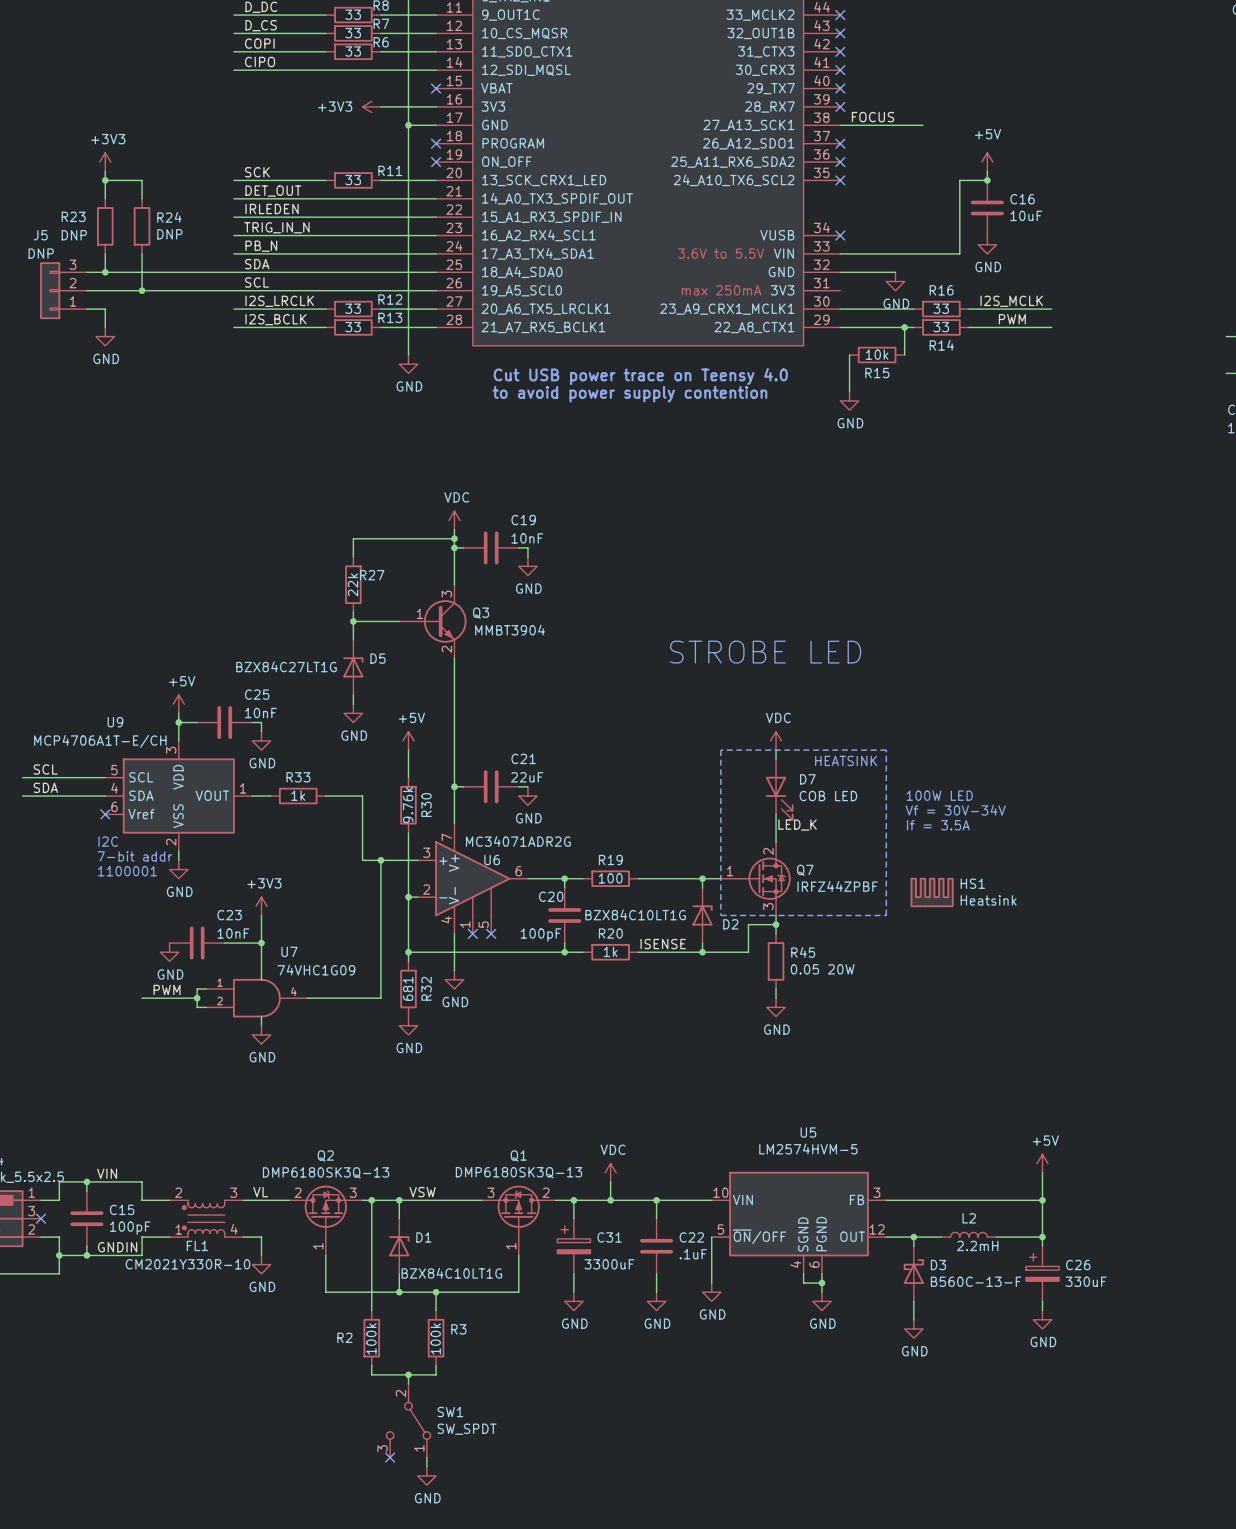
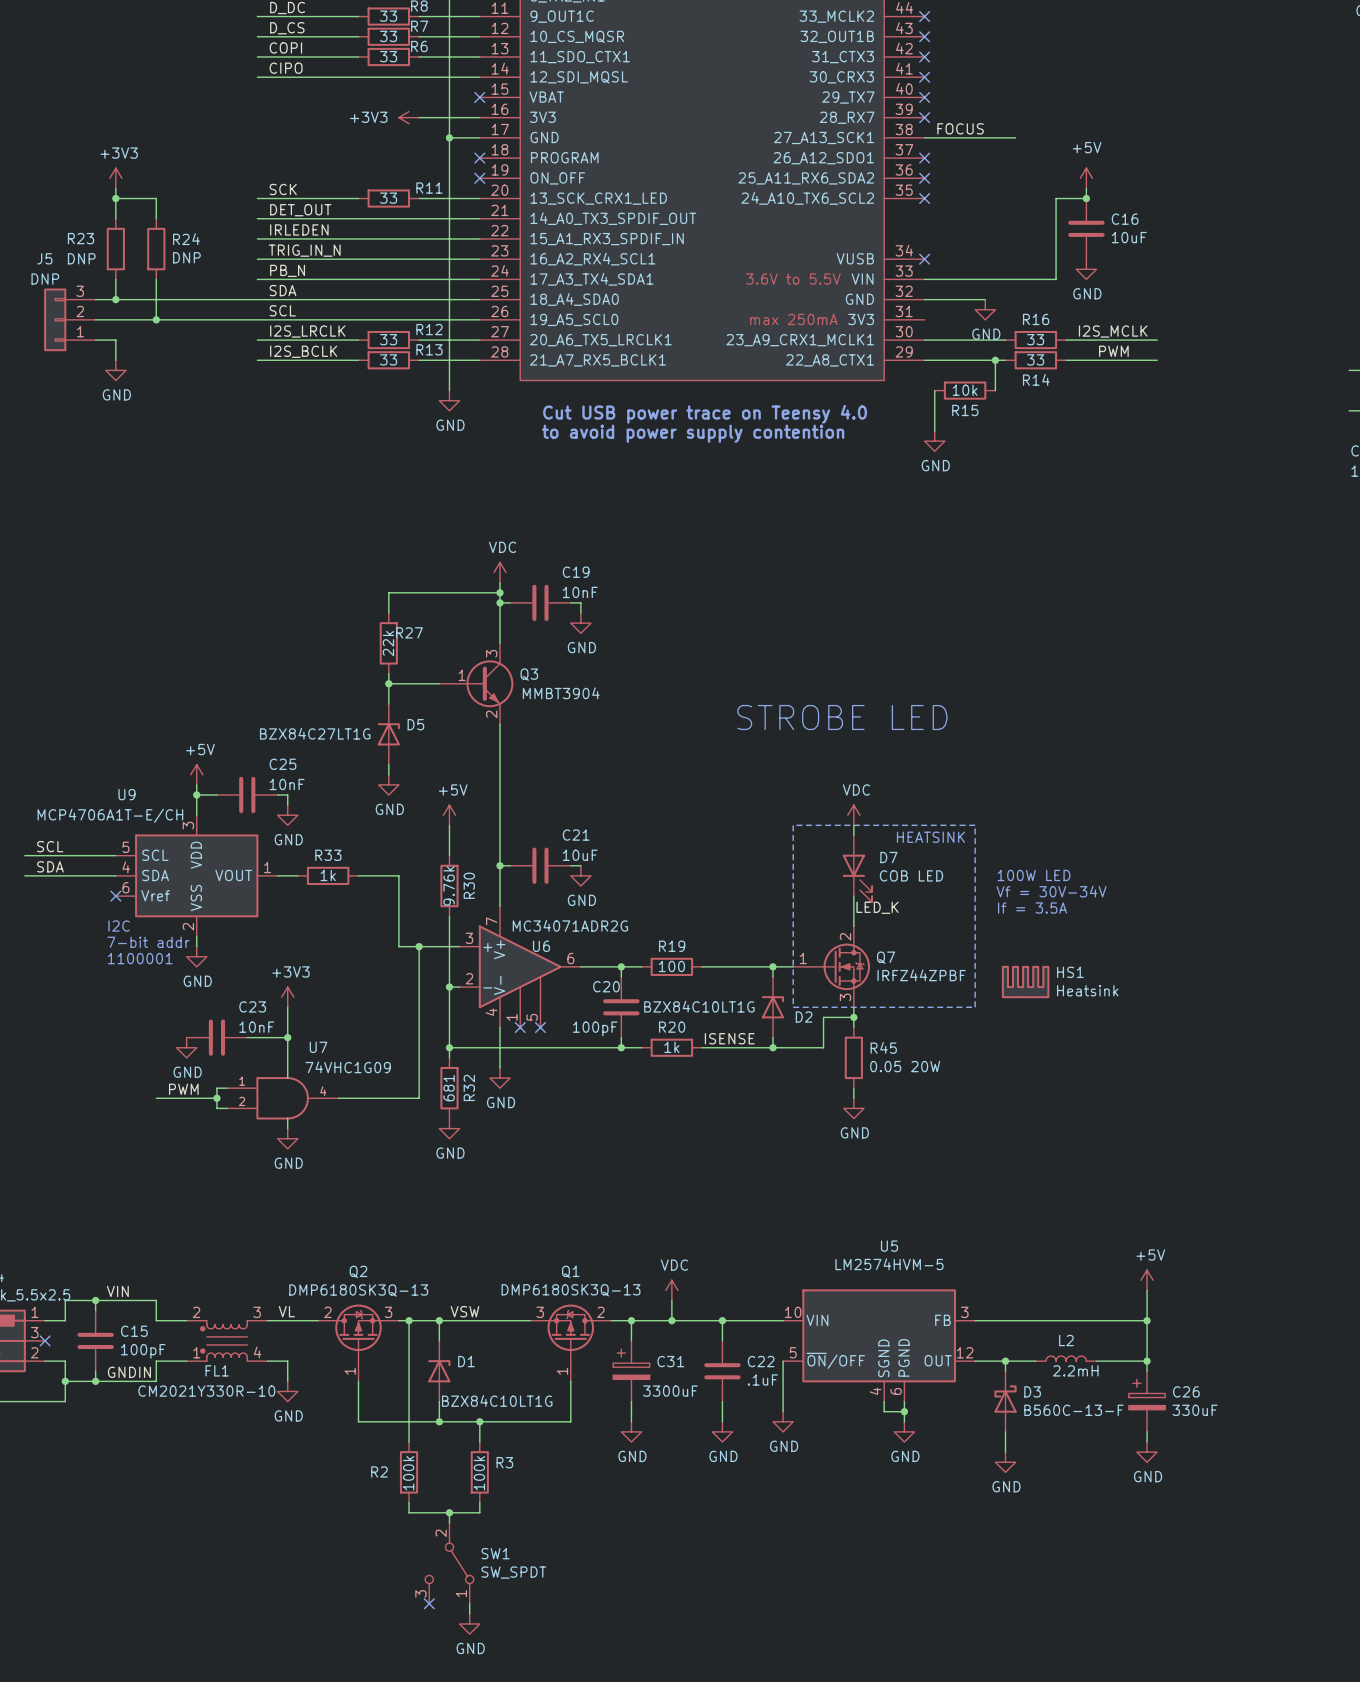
C21 value: 22uF (527, 777) -> 10uF (580, 855)

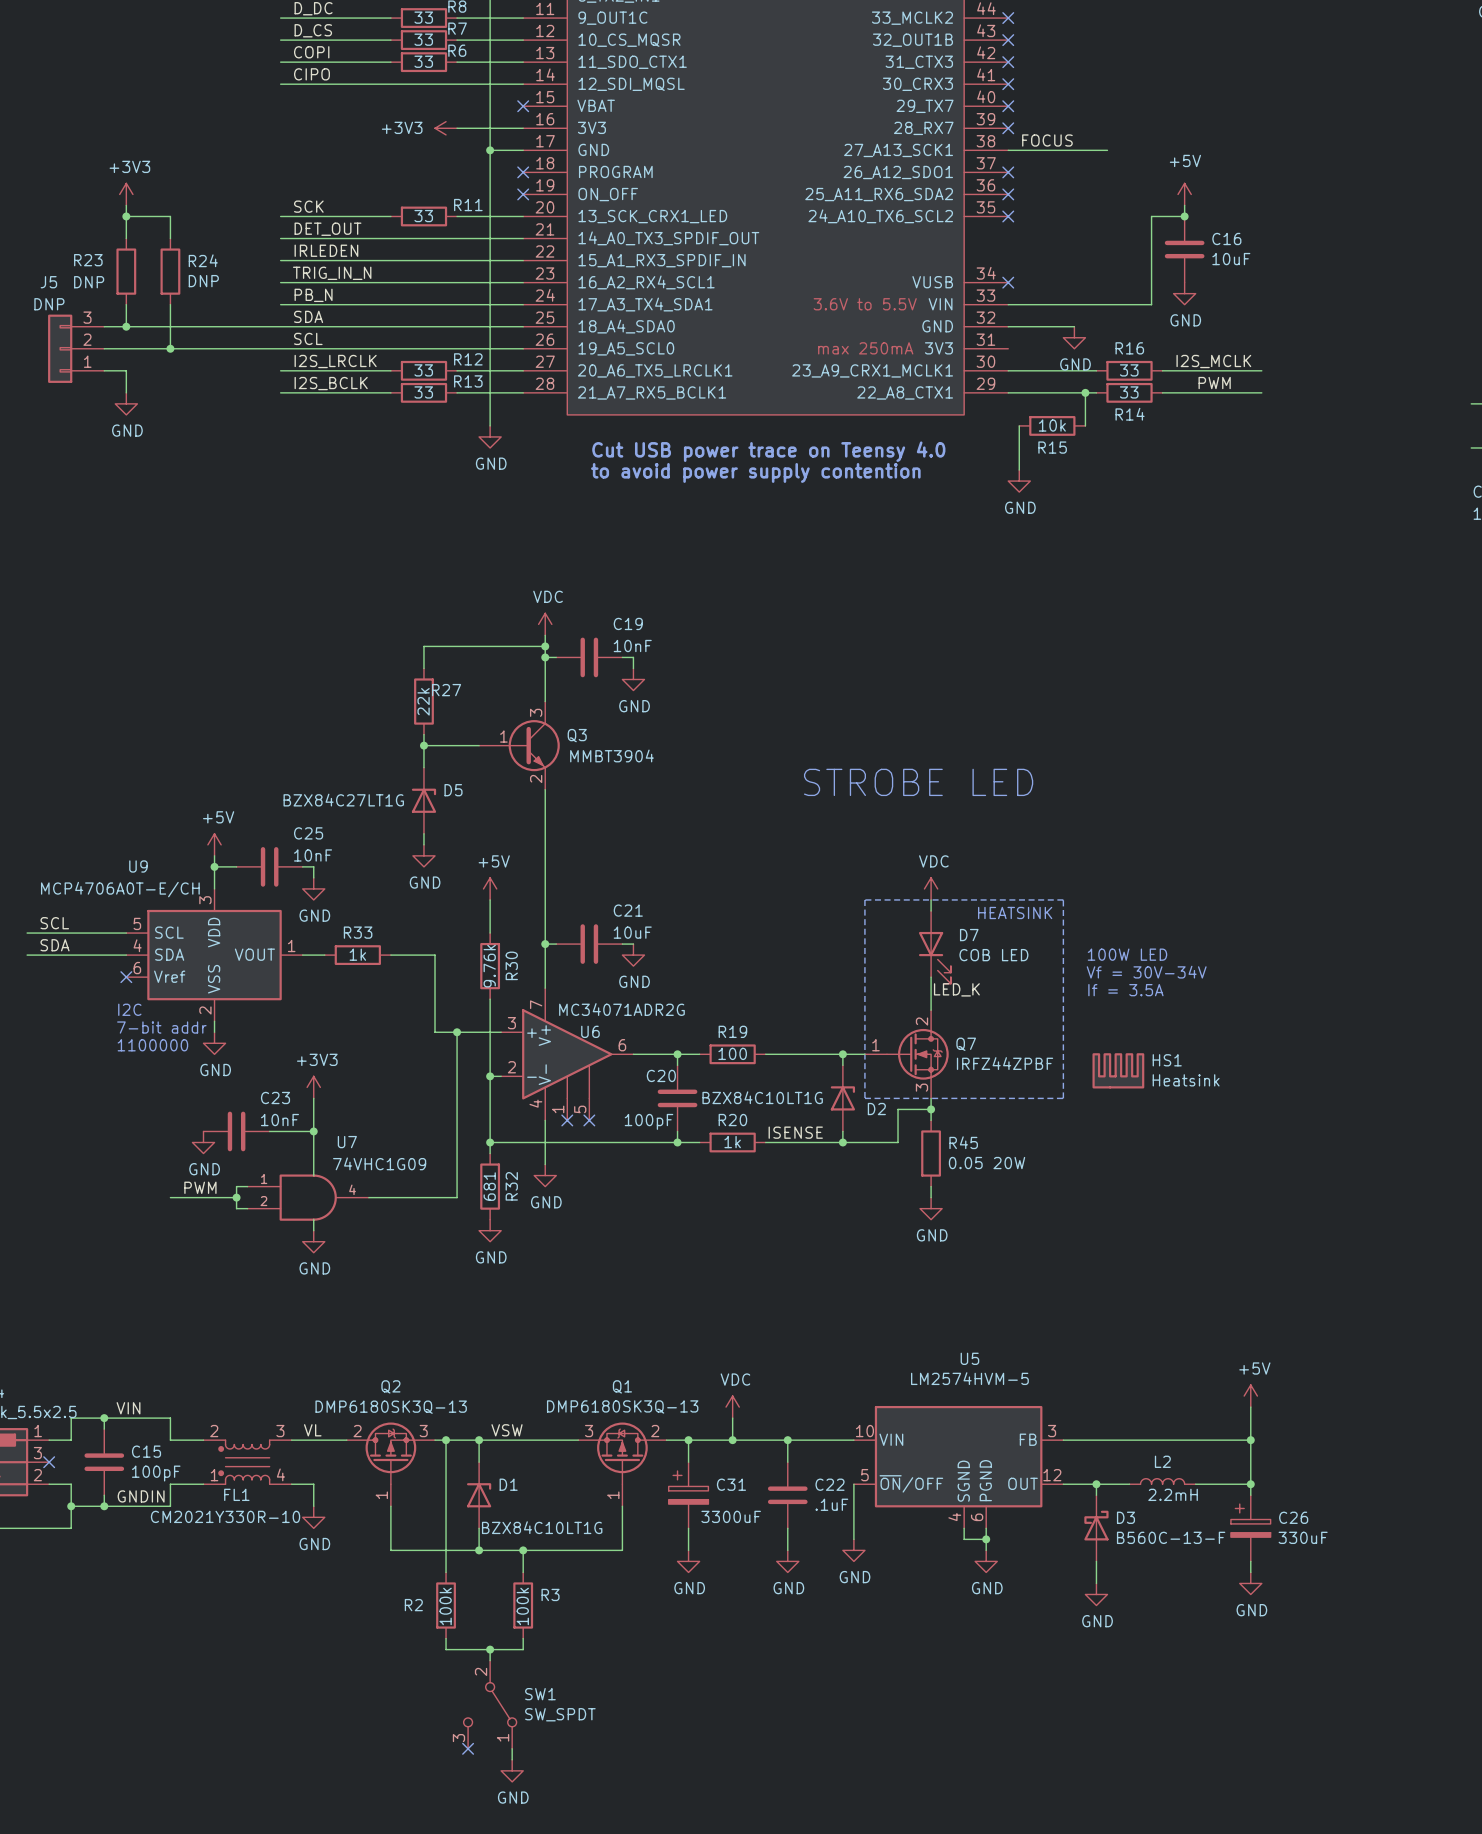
U9 value: MCP4706A1T-E/CH (110, 815) -> MCP4706A0T-E/CH (120, 889)
text: 1100001 (140, 958) -> 1100000 (152, 1045)

